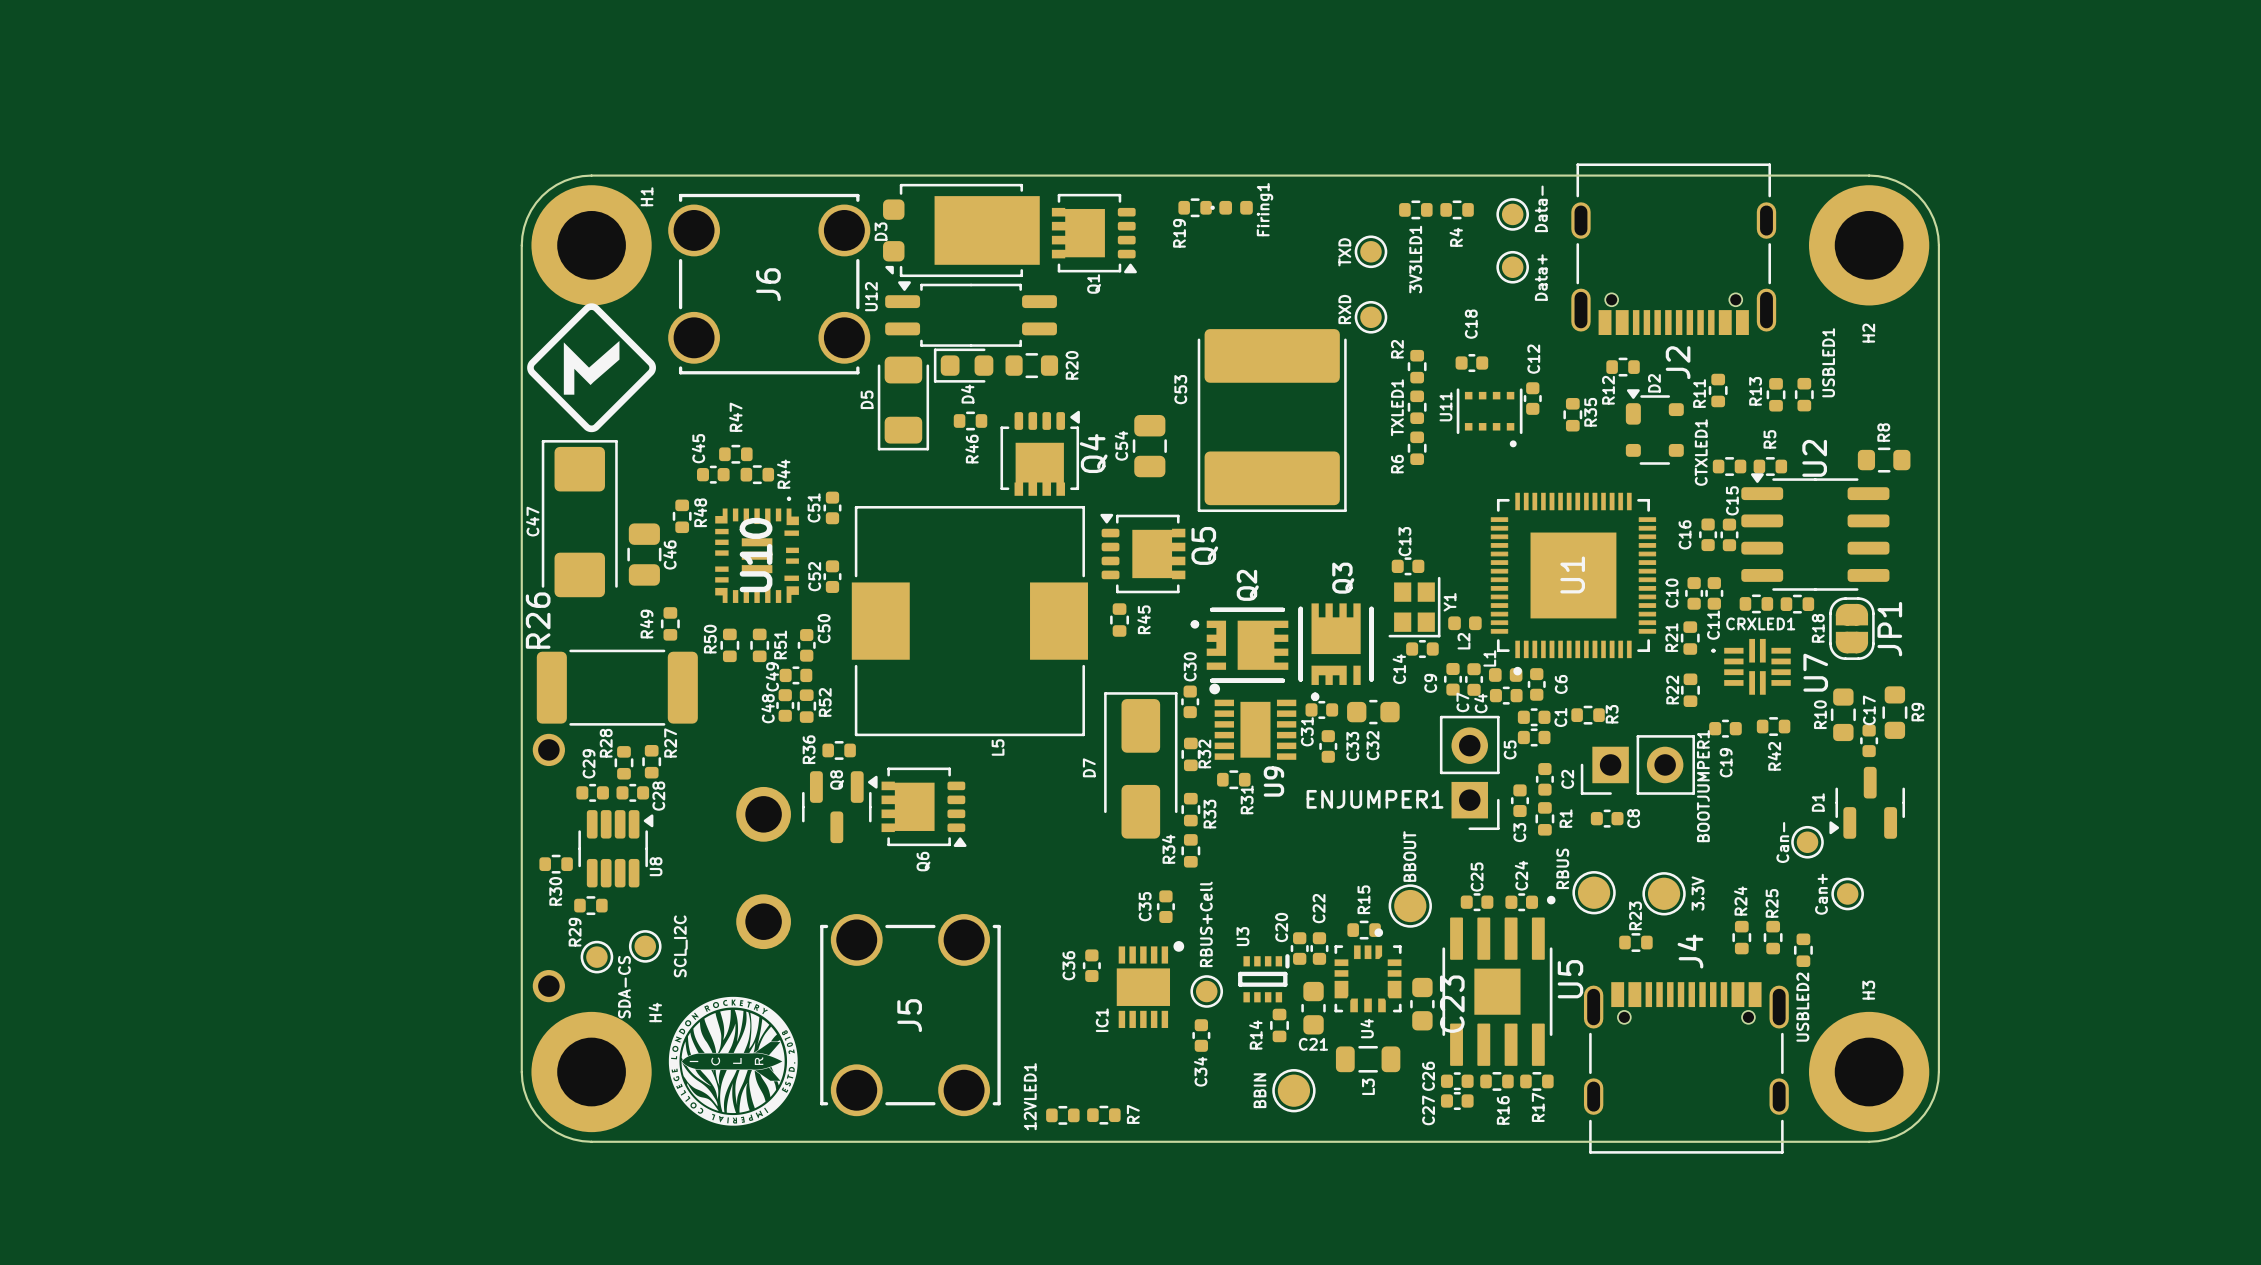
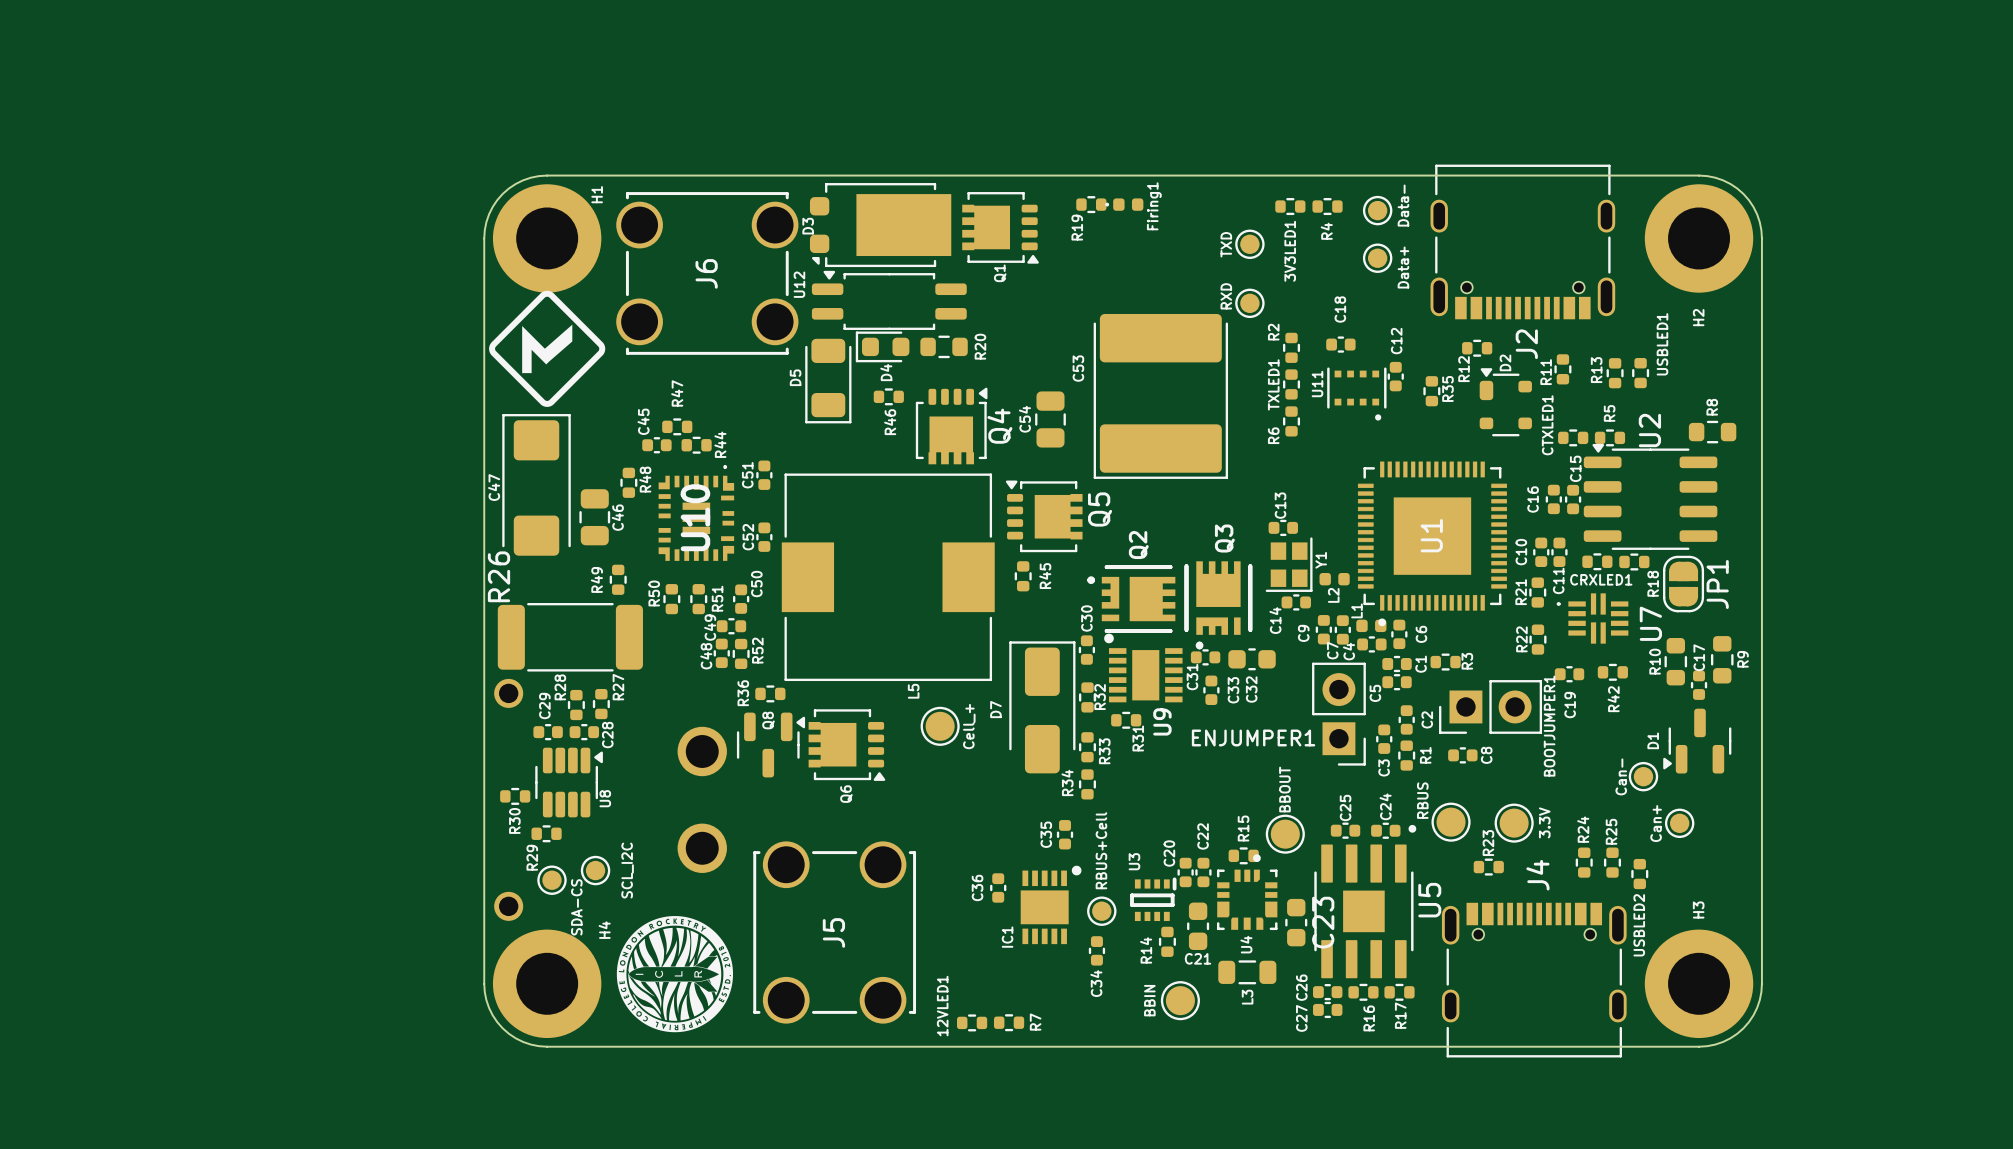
part: none -> (940, 726)

